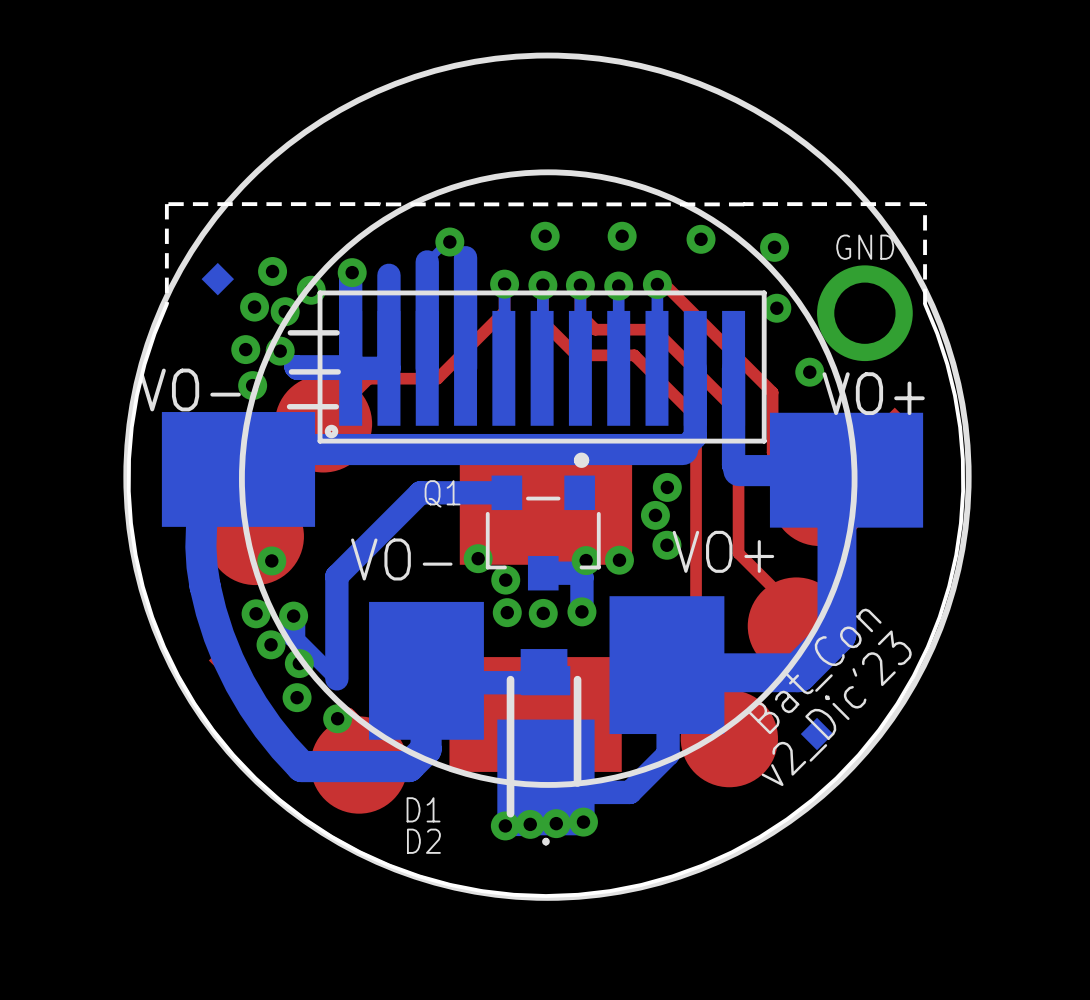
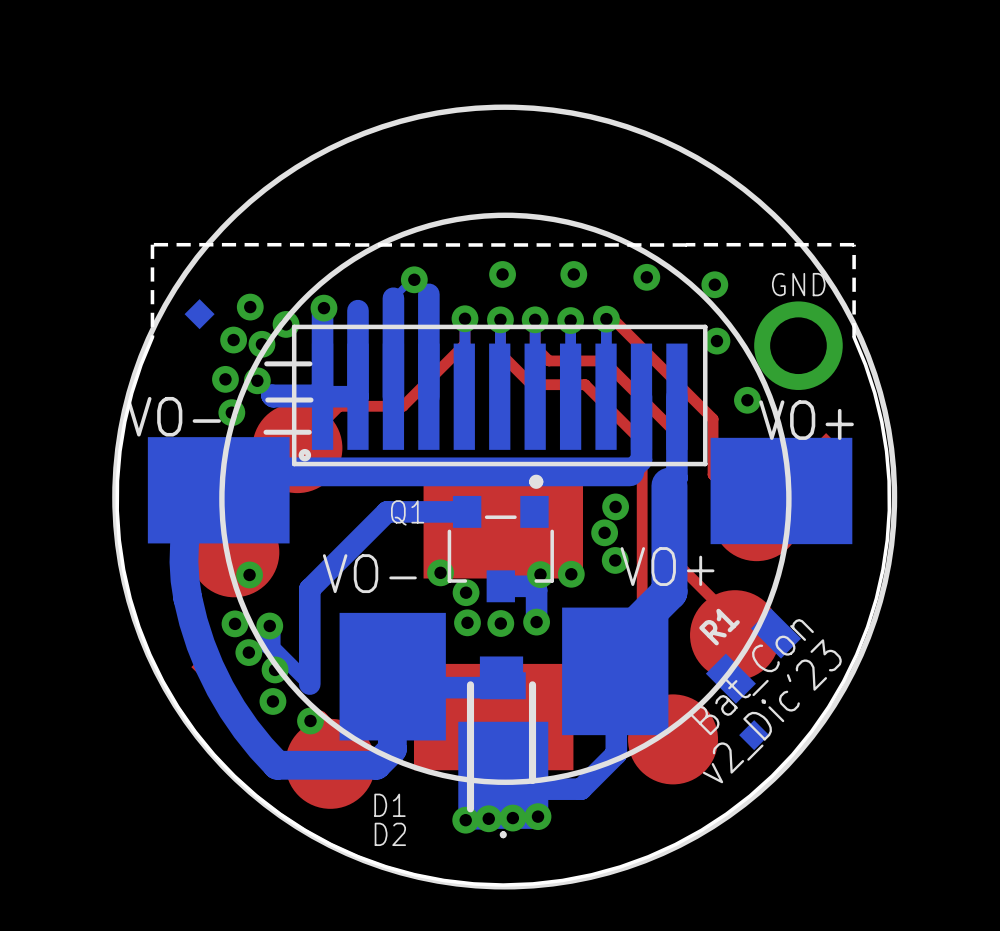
bottom track: (733, 456) (733, 465) (738, 470) (836, 470) (836, 634) (798, 672) (682, 671) -> (676, 478) (669, 485) (669, 591) (615, 646) (615, 669)
R1: none -> (753, 656)

